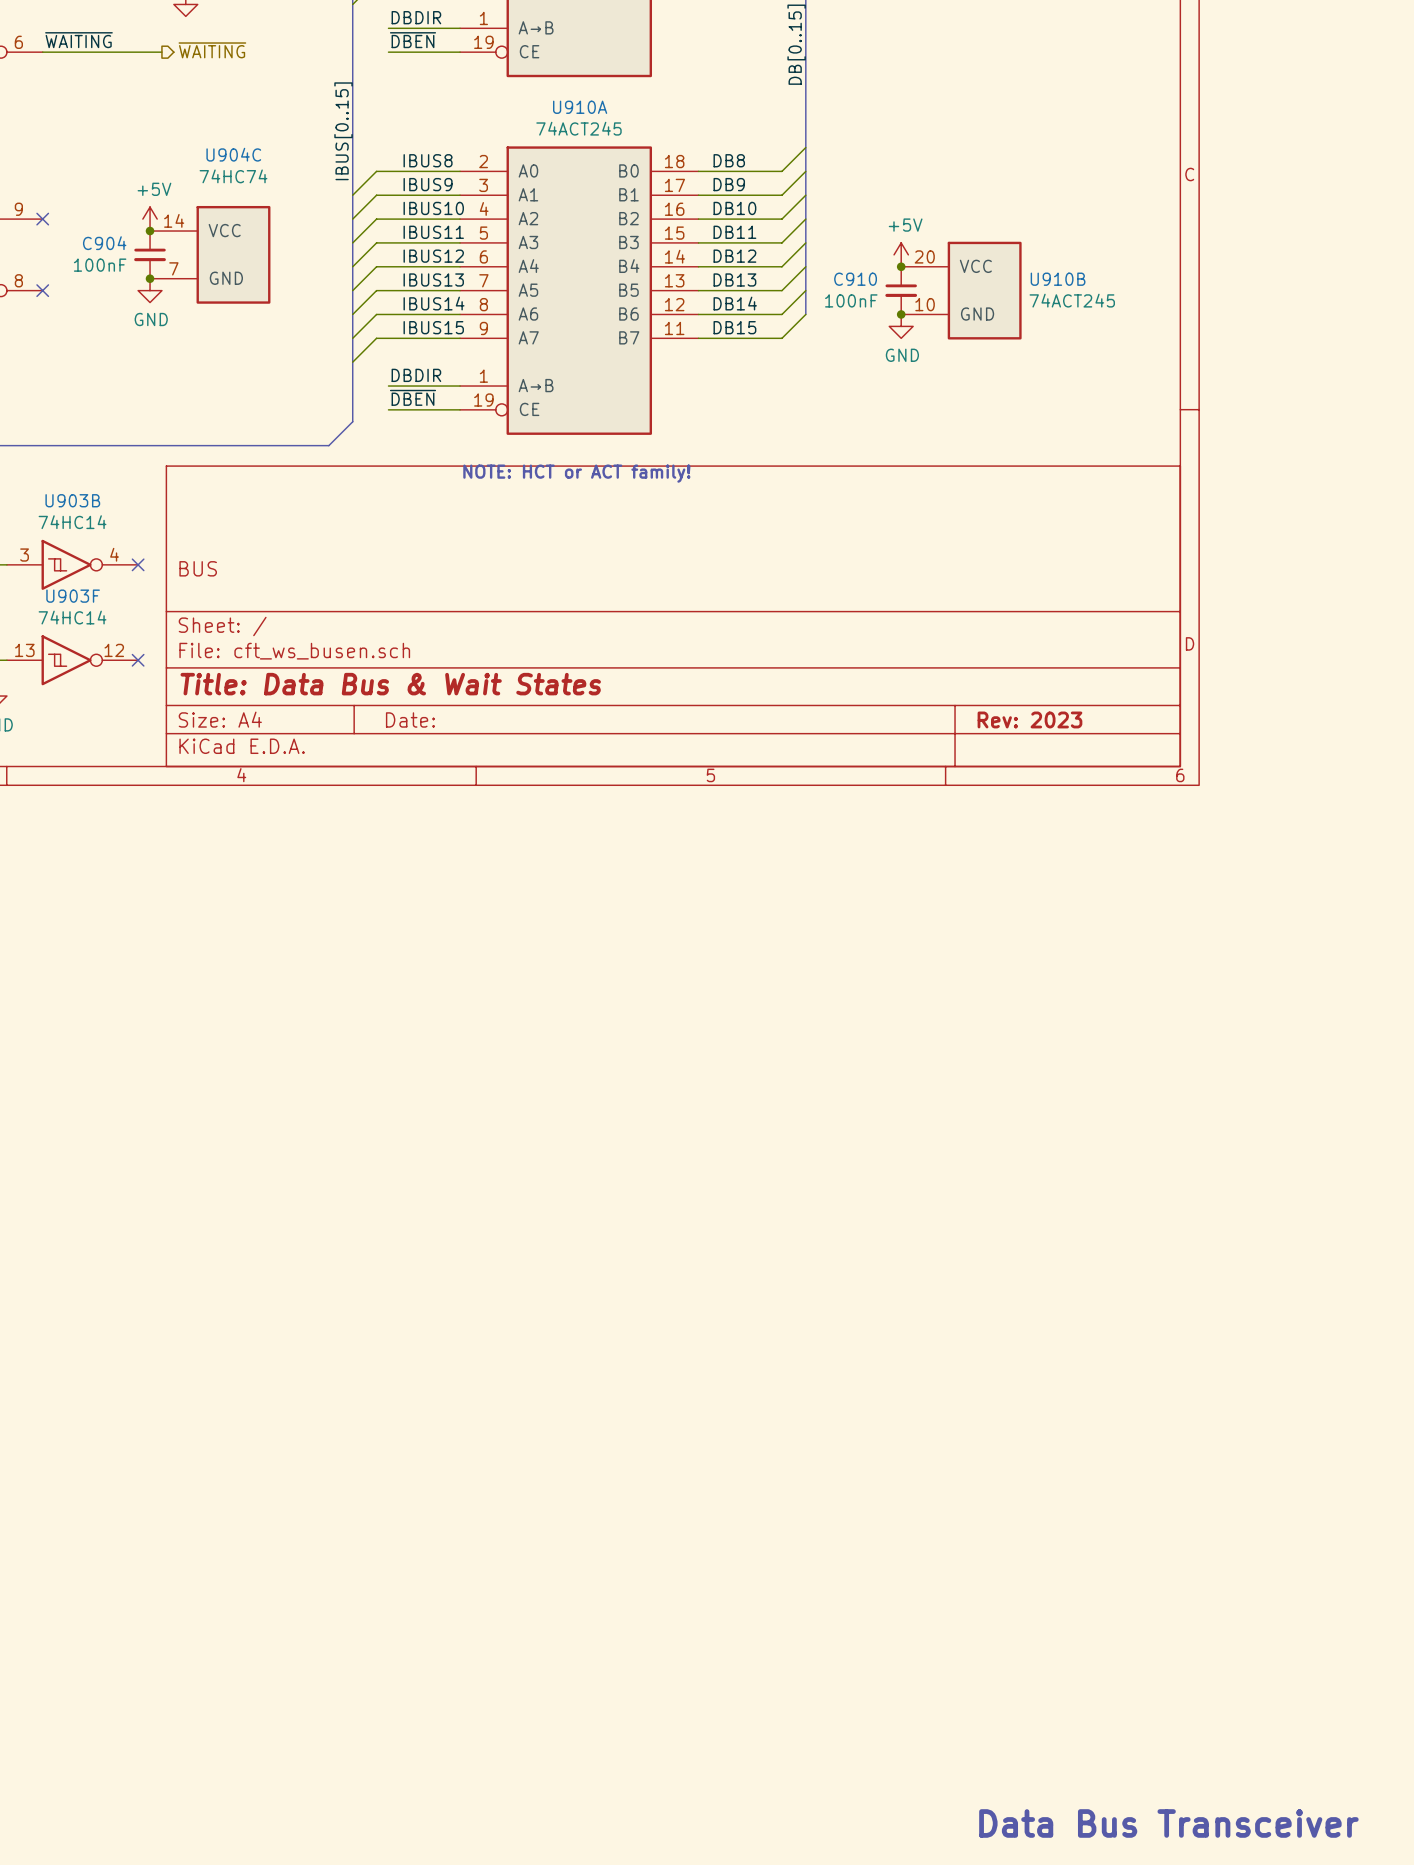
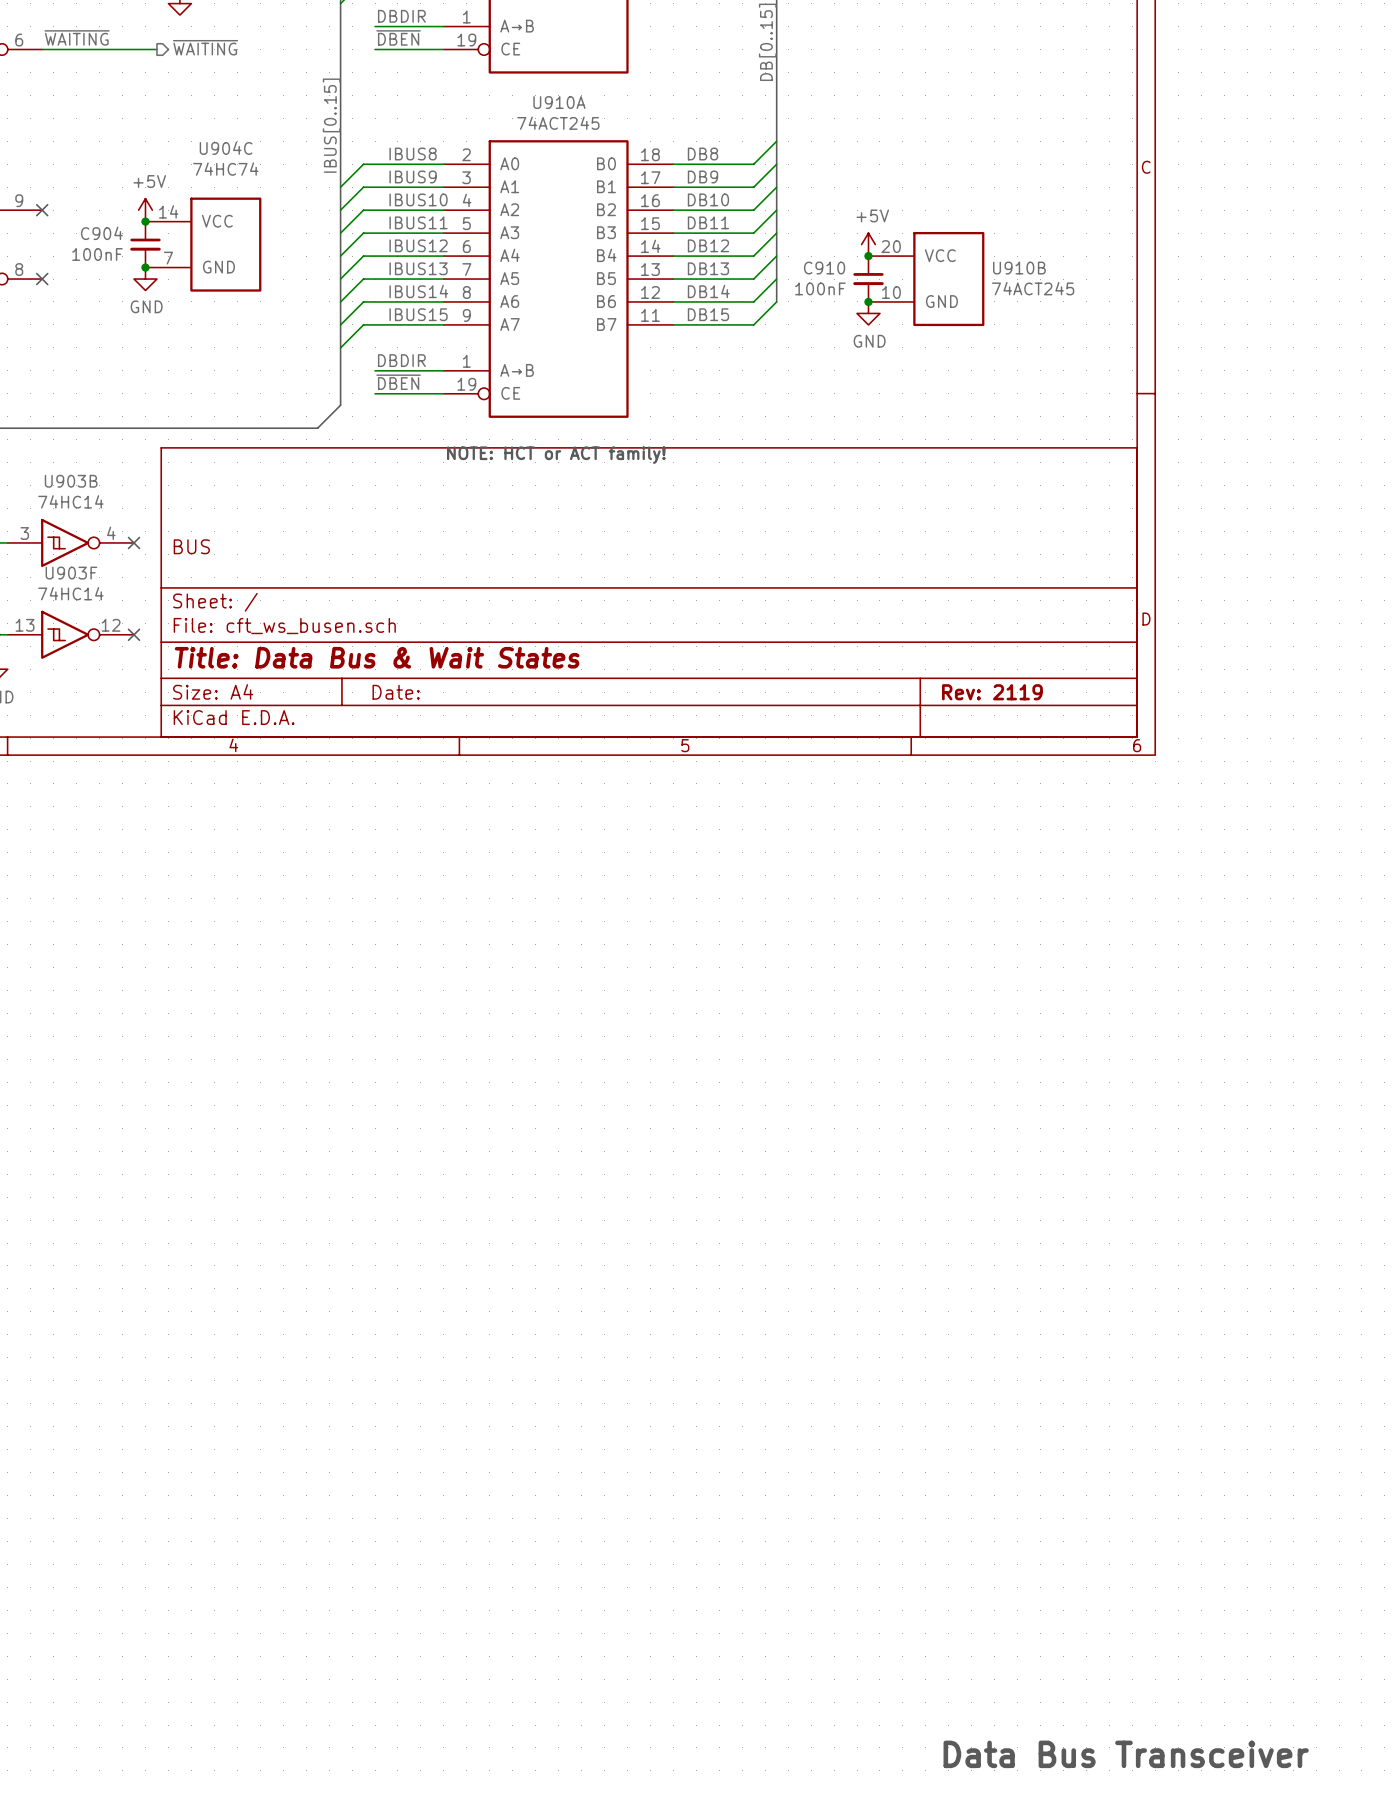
title block: Rev: 2023 (1029, 719) -> Rev: 2119 (992, 692)

